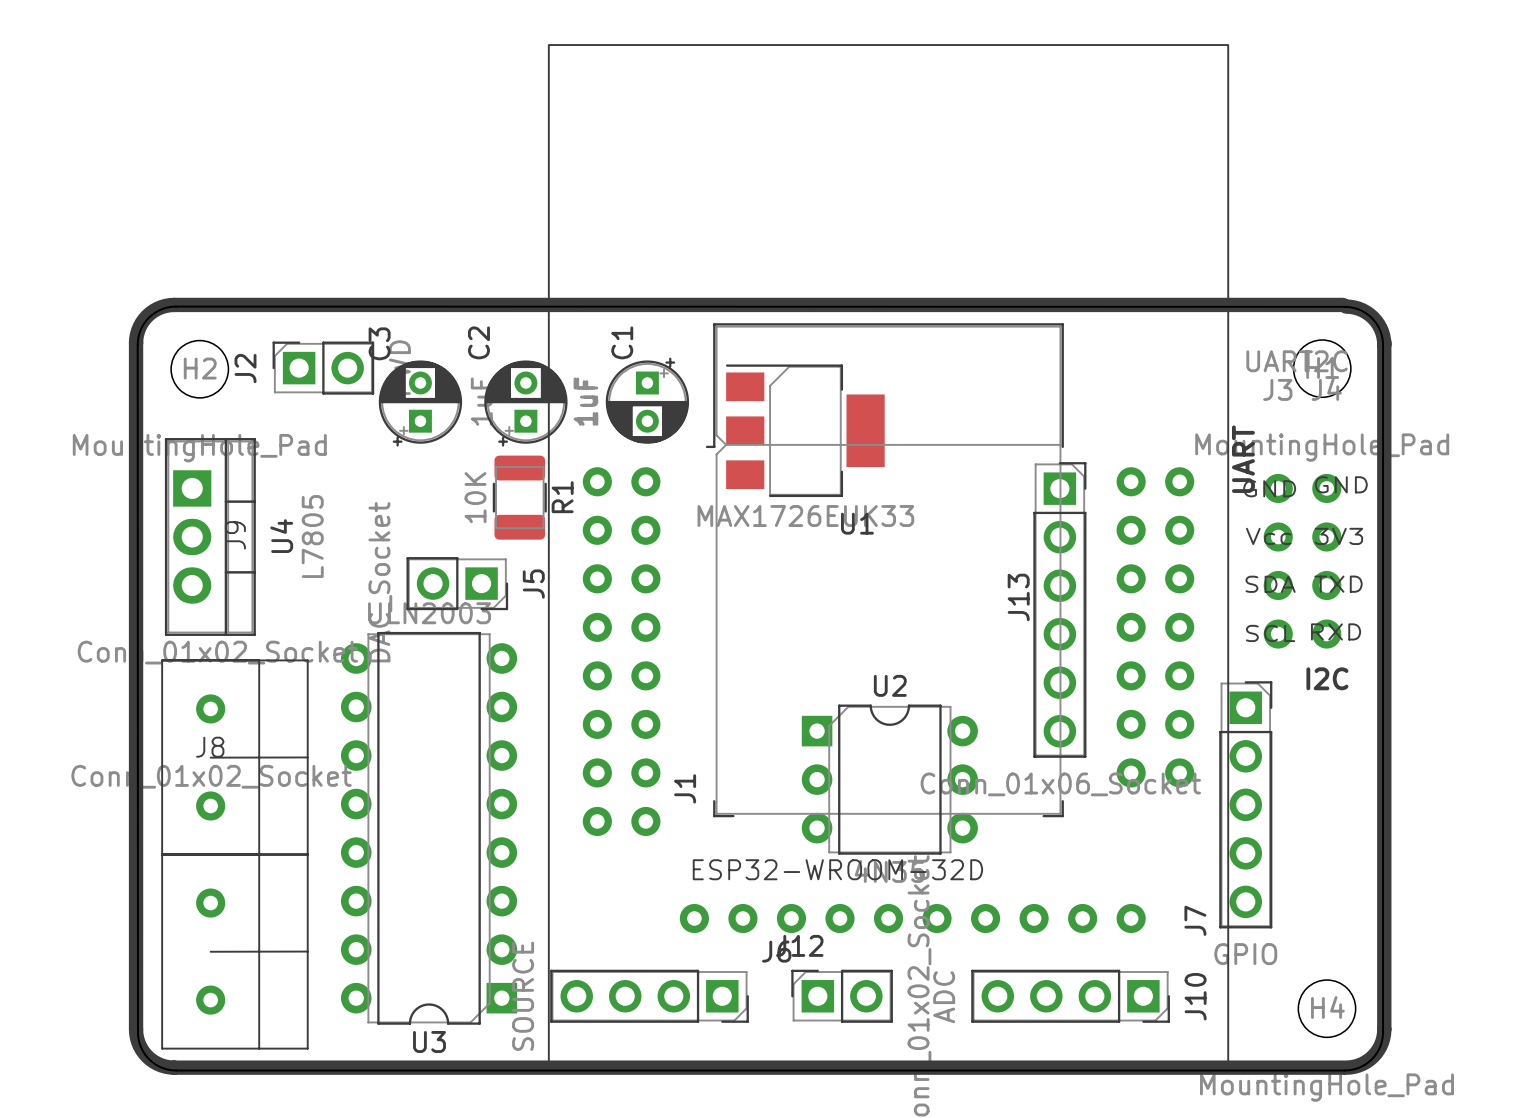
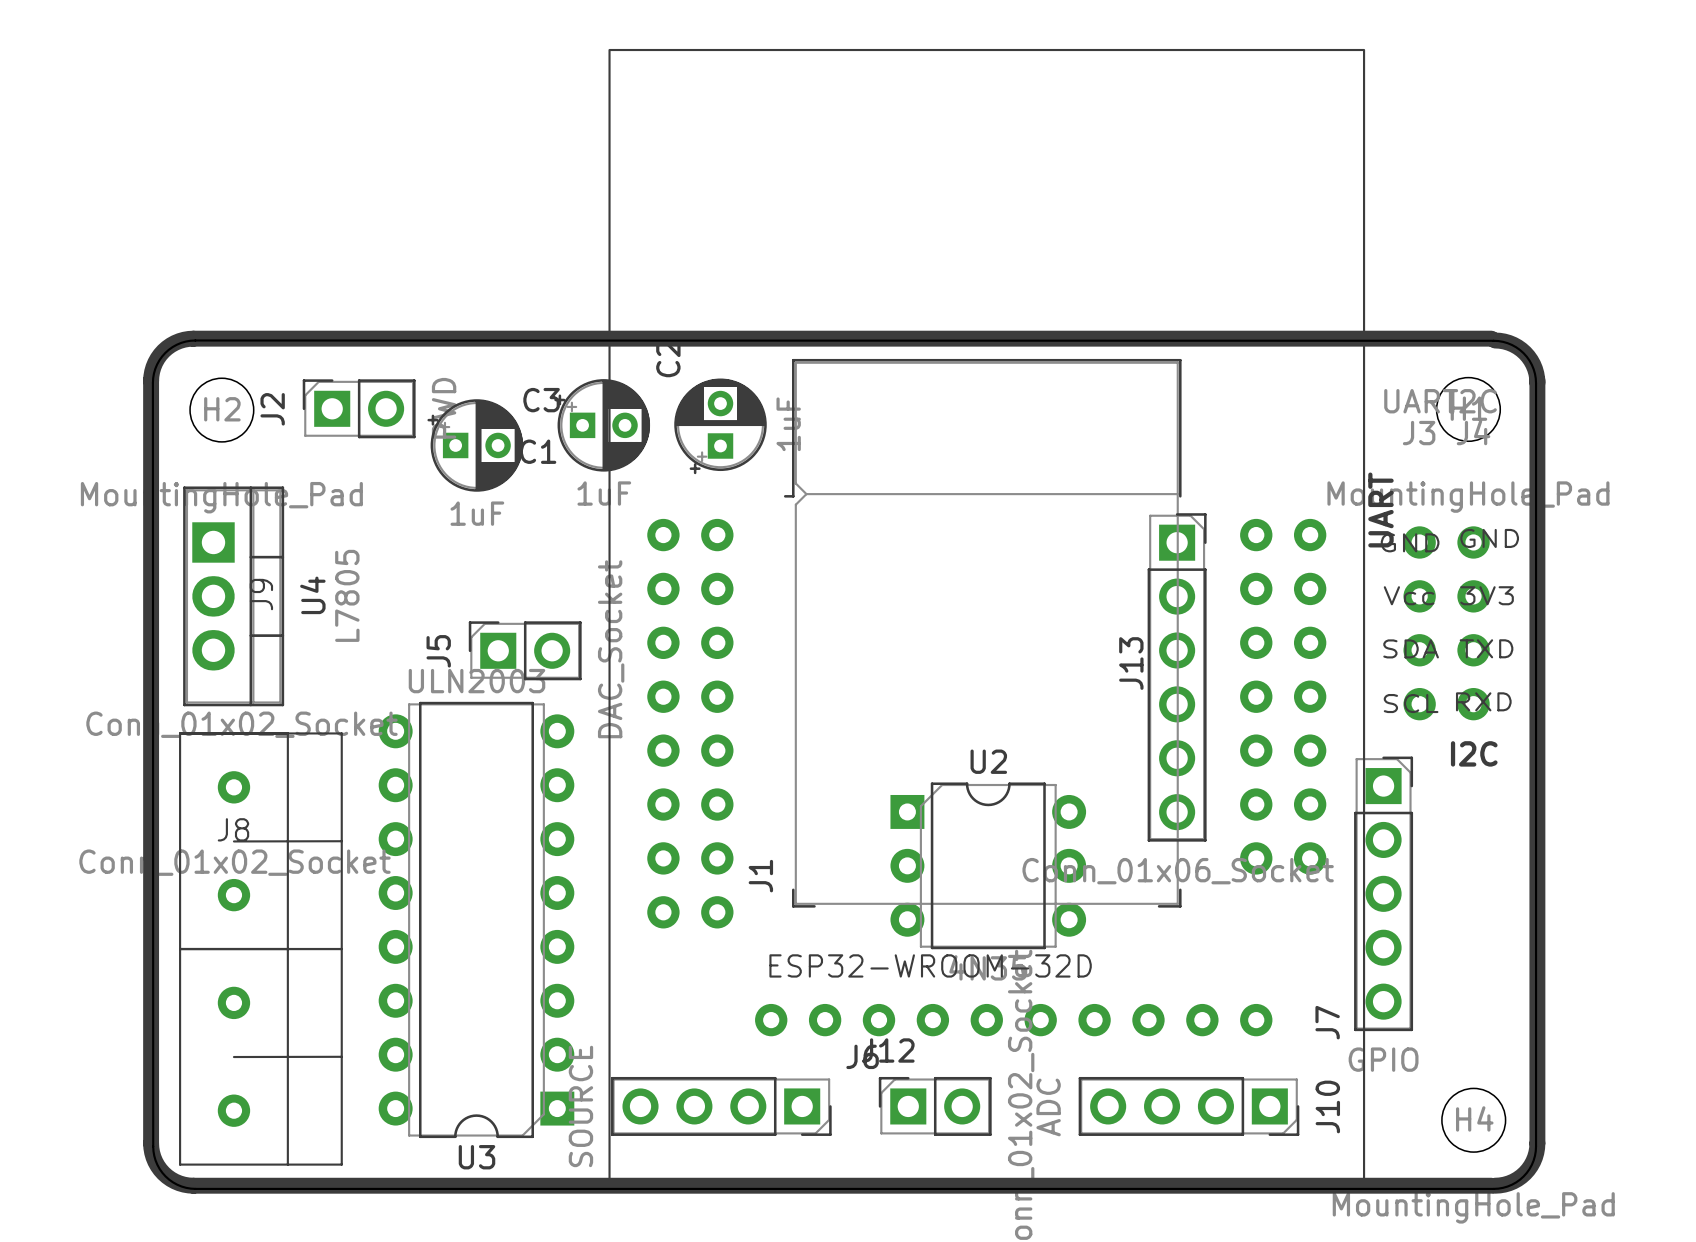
C1 rotation: 0° (647, 400) -> 90° counterclockwise (602, 425)
C1 position: (647, 400) -> (602, 425)
C3 rotation: 0° (420, 403) -> 90° clockwise (475, 445)
C2 position: (525, 403) -> (720, 426)
U1: MAX1726EUK33 (805, 430) -> none
R1: 10K (519, 497) -> none
J5 rotation: 0° (457, 583) -> 180° (525, 650)

